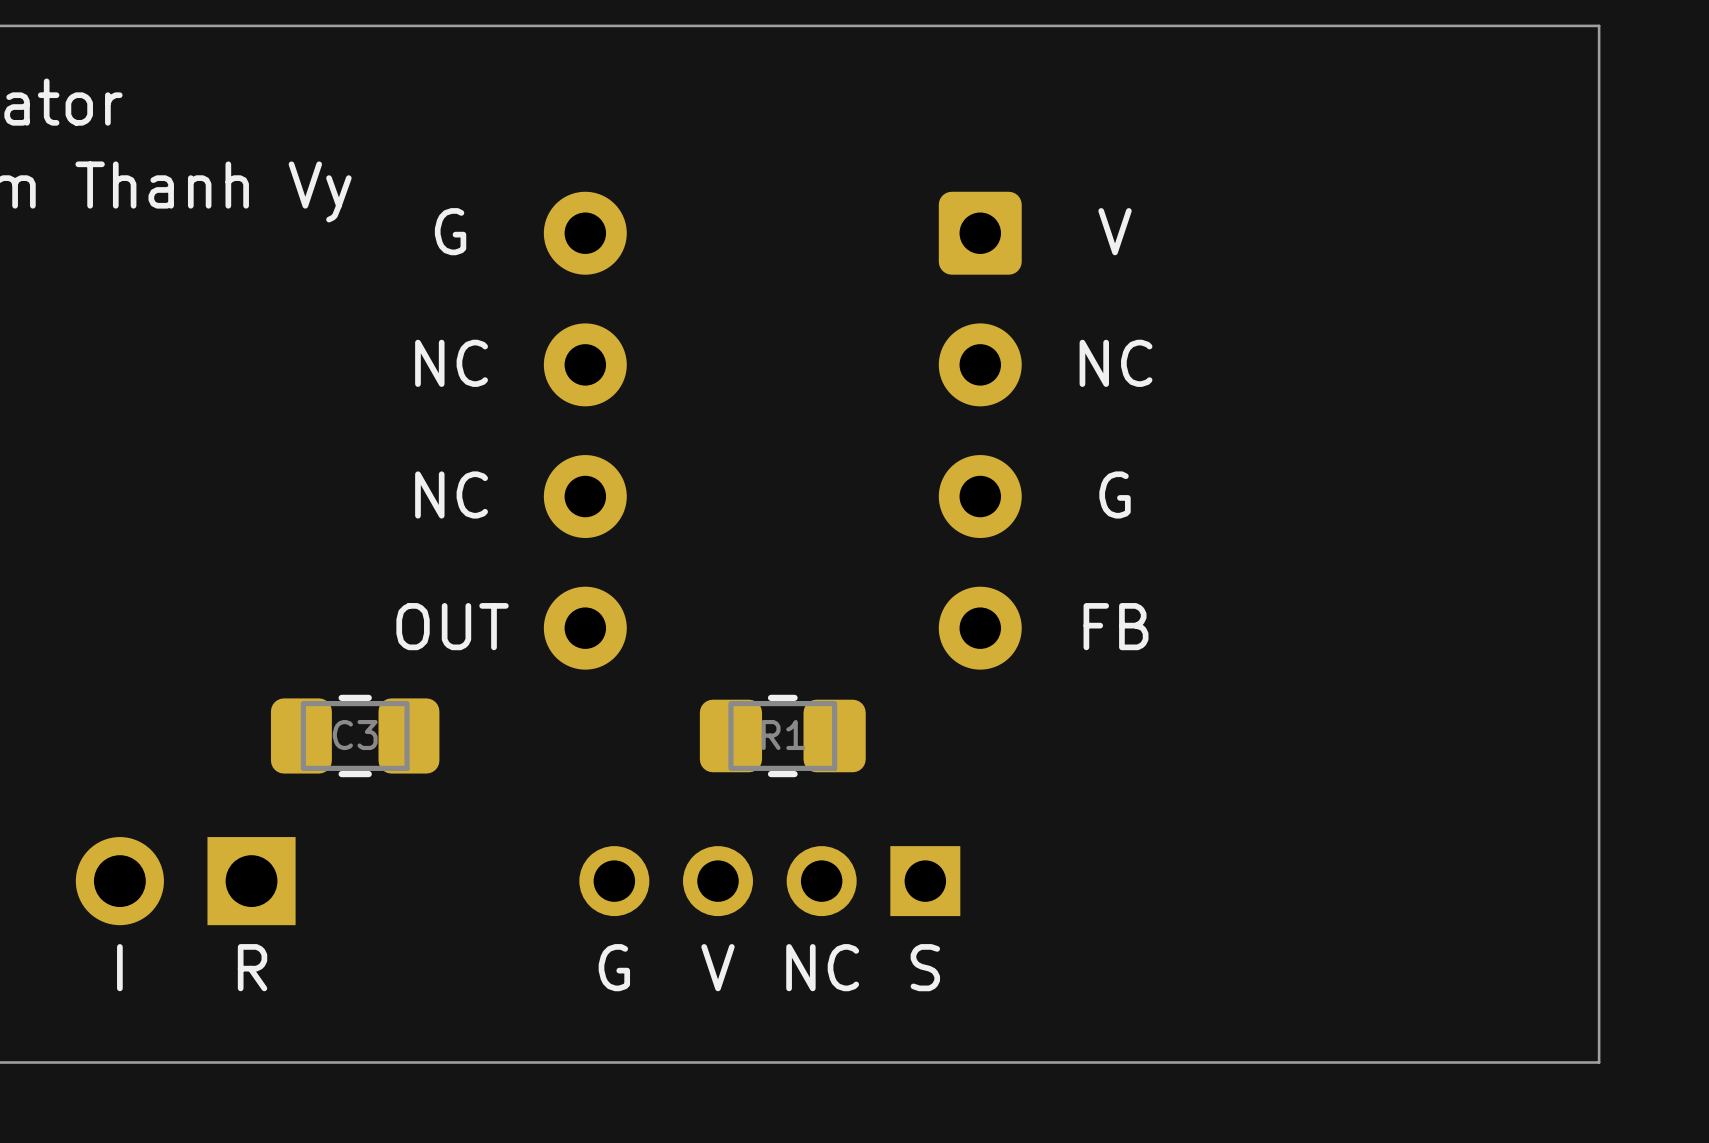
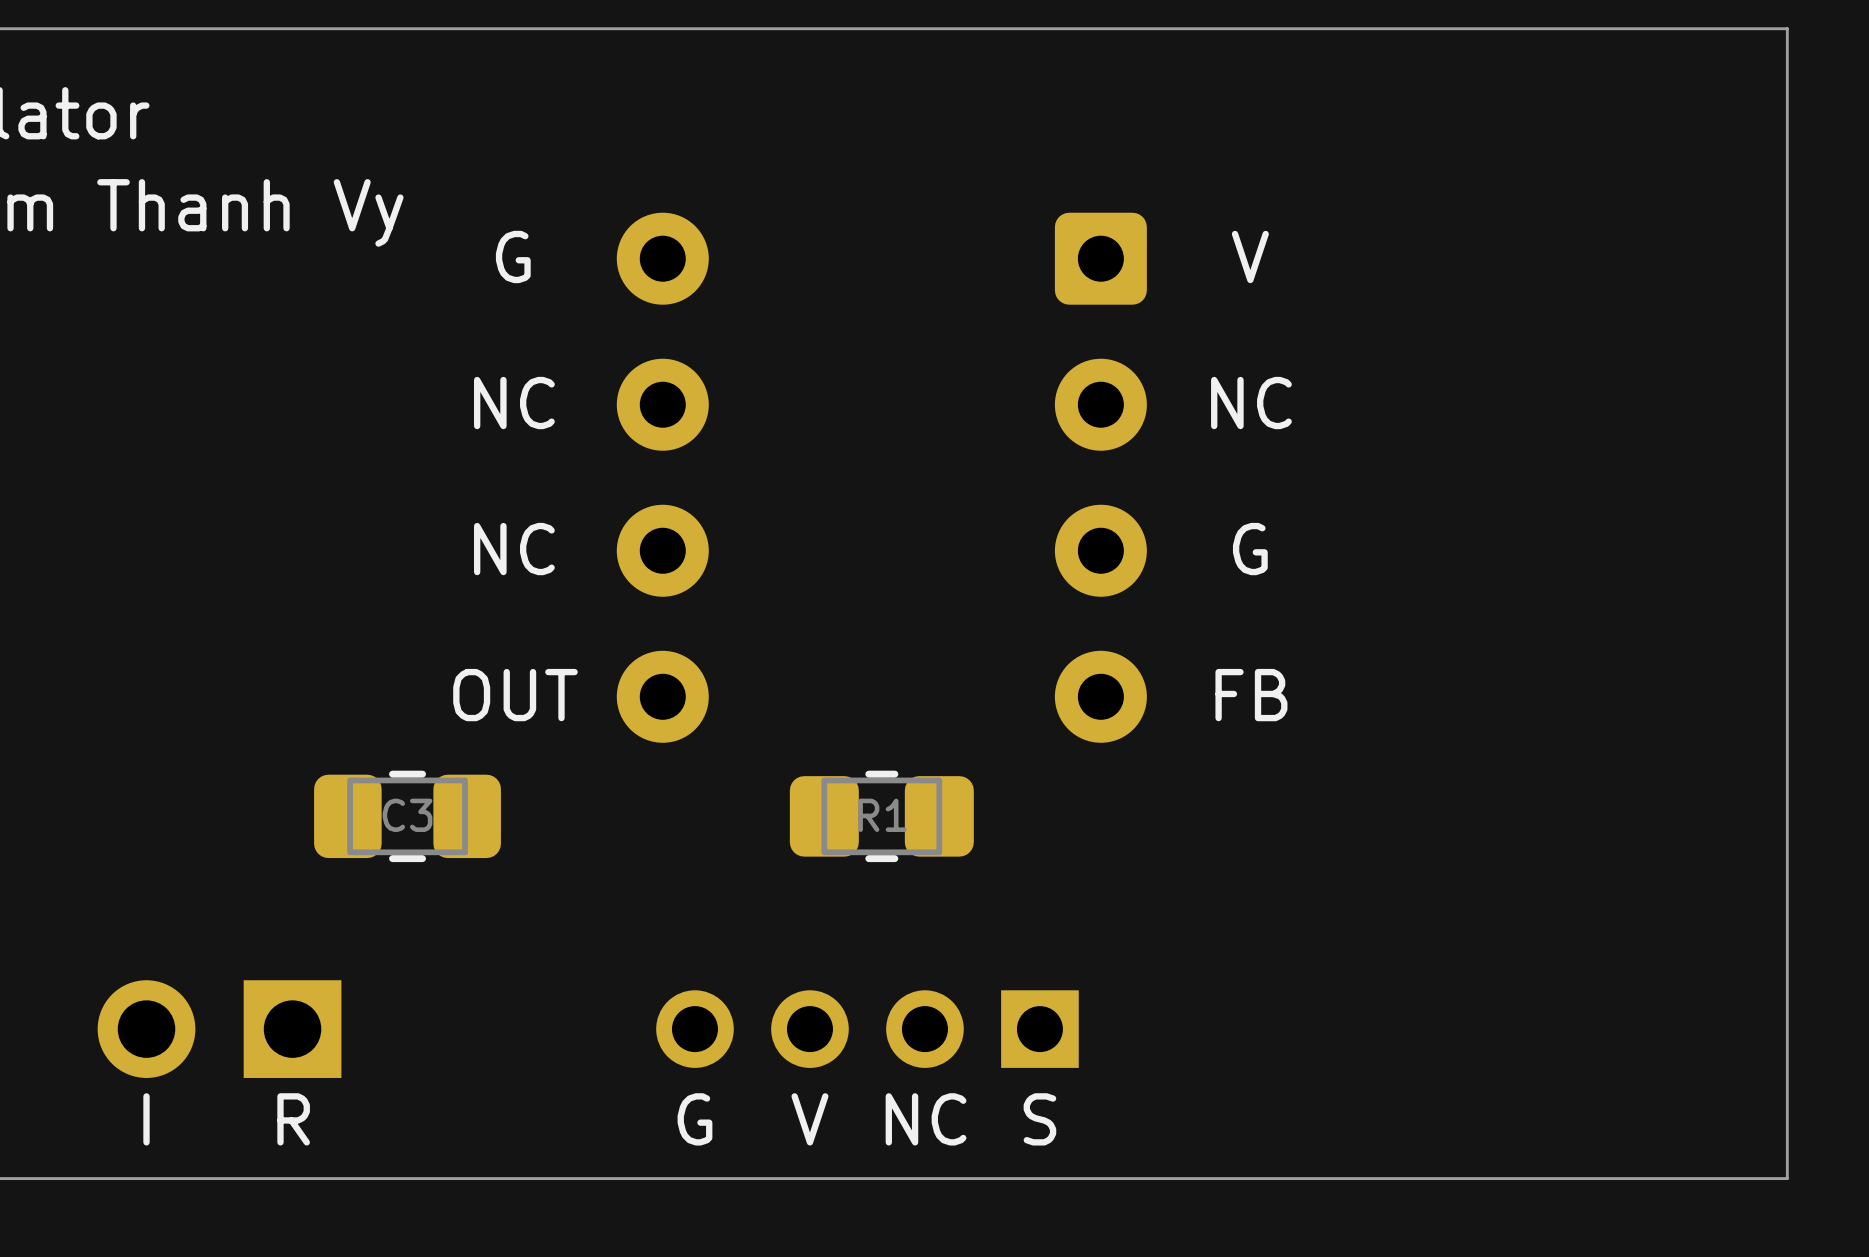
part position: (185, 881) -> (219, 1029)
part position: (769, 881) -> (867, 1029)
text position: I (119, 967) -> I (146, 1119)
text position: R (252, 967) -> R (293, 1119)
text position: G (614, 967) -> G (694, 1119)
text position: V (718, 967) -> V (809, 1119)
text position: NC (822, 967) -> NC (926, 1119)
text position: S (925, 967) -> S (1039, 1119)

